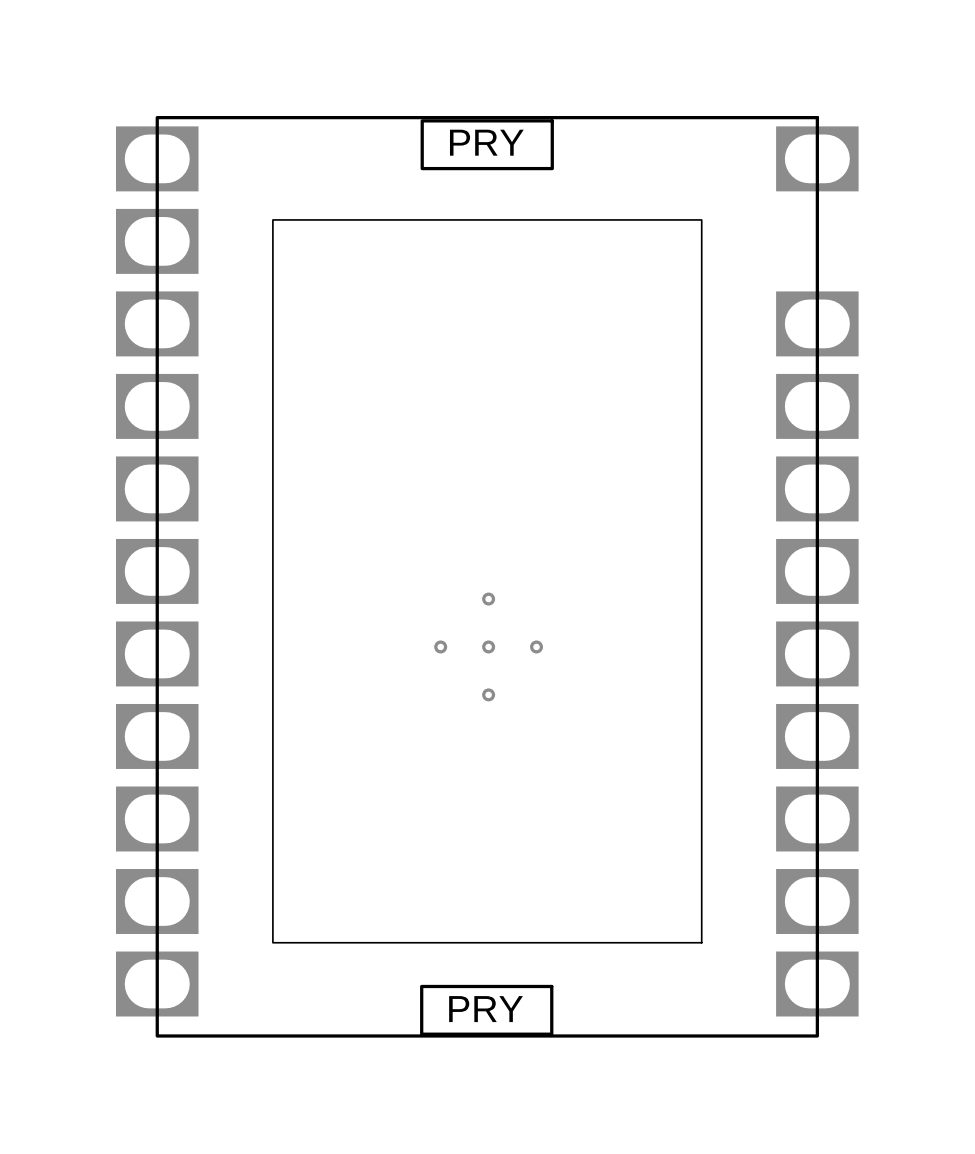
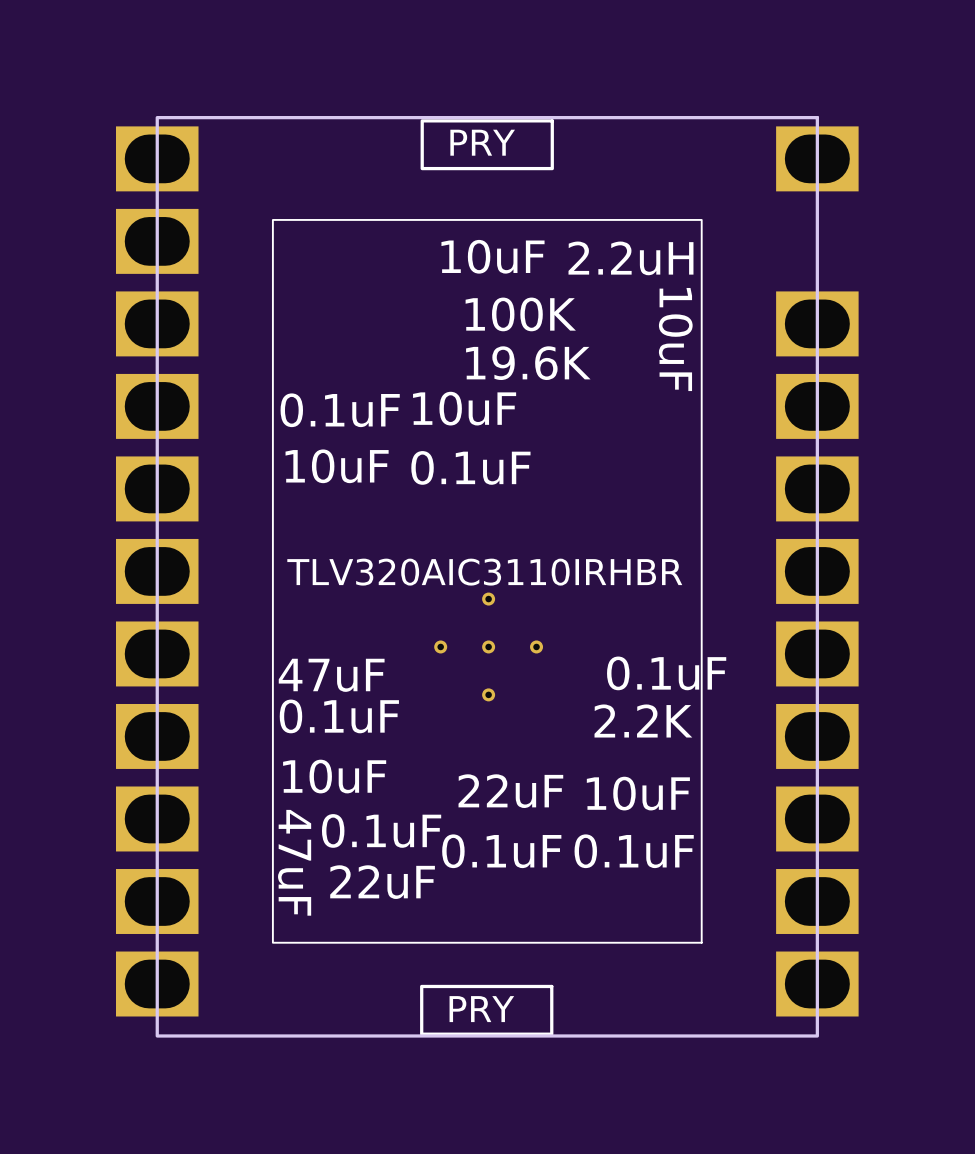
part: none -> 10uF (493, 256)
part: none -> 2.2uH (630, 258)
part: none -> 100K (520, 314)
part: none -> 10uF (675, 339)
part: none -> 19.6K (528, 363)
part: none -> 10uF (464, 408)
part: none -> 0.1uF (340, 410)
part: none -> 10uF (337, 466)
part: none -> 0.1uF (470, 467)
part value: none -> TLV320AIC3110IRHBR (484, 572)
part: none -> 0.1uF (666, 673)
part: none -> 47uF (331, 675)
part: none -> 0.1uF (339, 716)
part: none -> 2.2K (643, 720)
part: none -> 10uF (334, 776)
part: none -> 22uF (510, 791)
part: none -> 10uF (638, 793)
part: none -> 0.1uF (381, 830)
part: none -> 0.1uF (501, 851)
part: none -> 0.1uF (634, 851)
part: none -> 47uF (294, 862)
part: none -> 22uF (382, 882)

